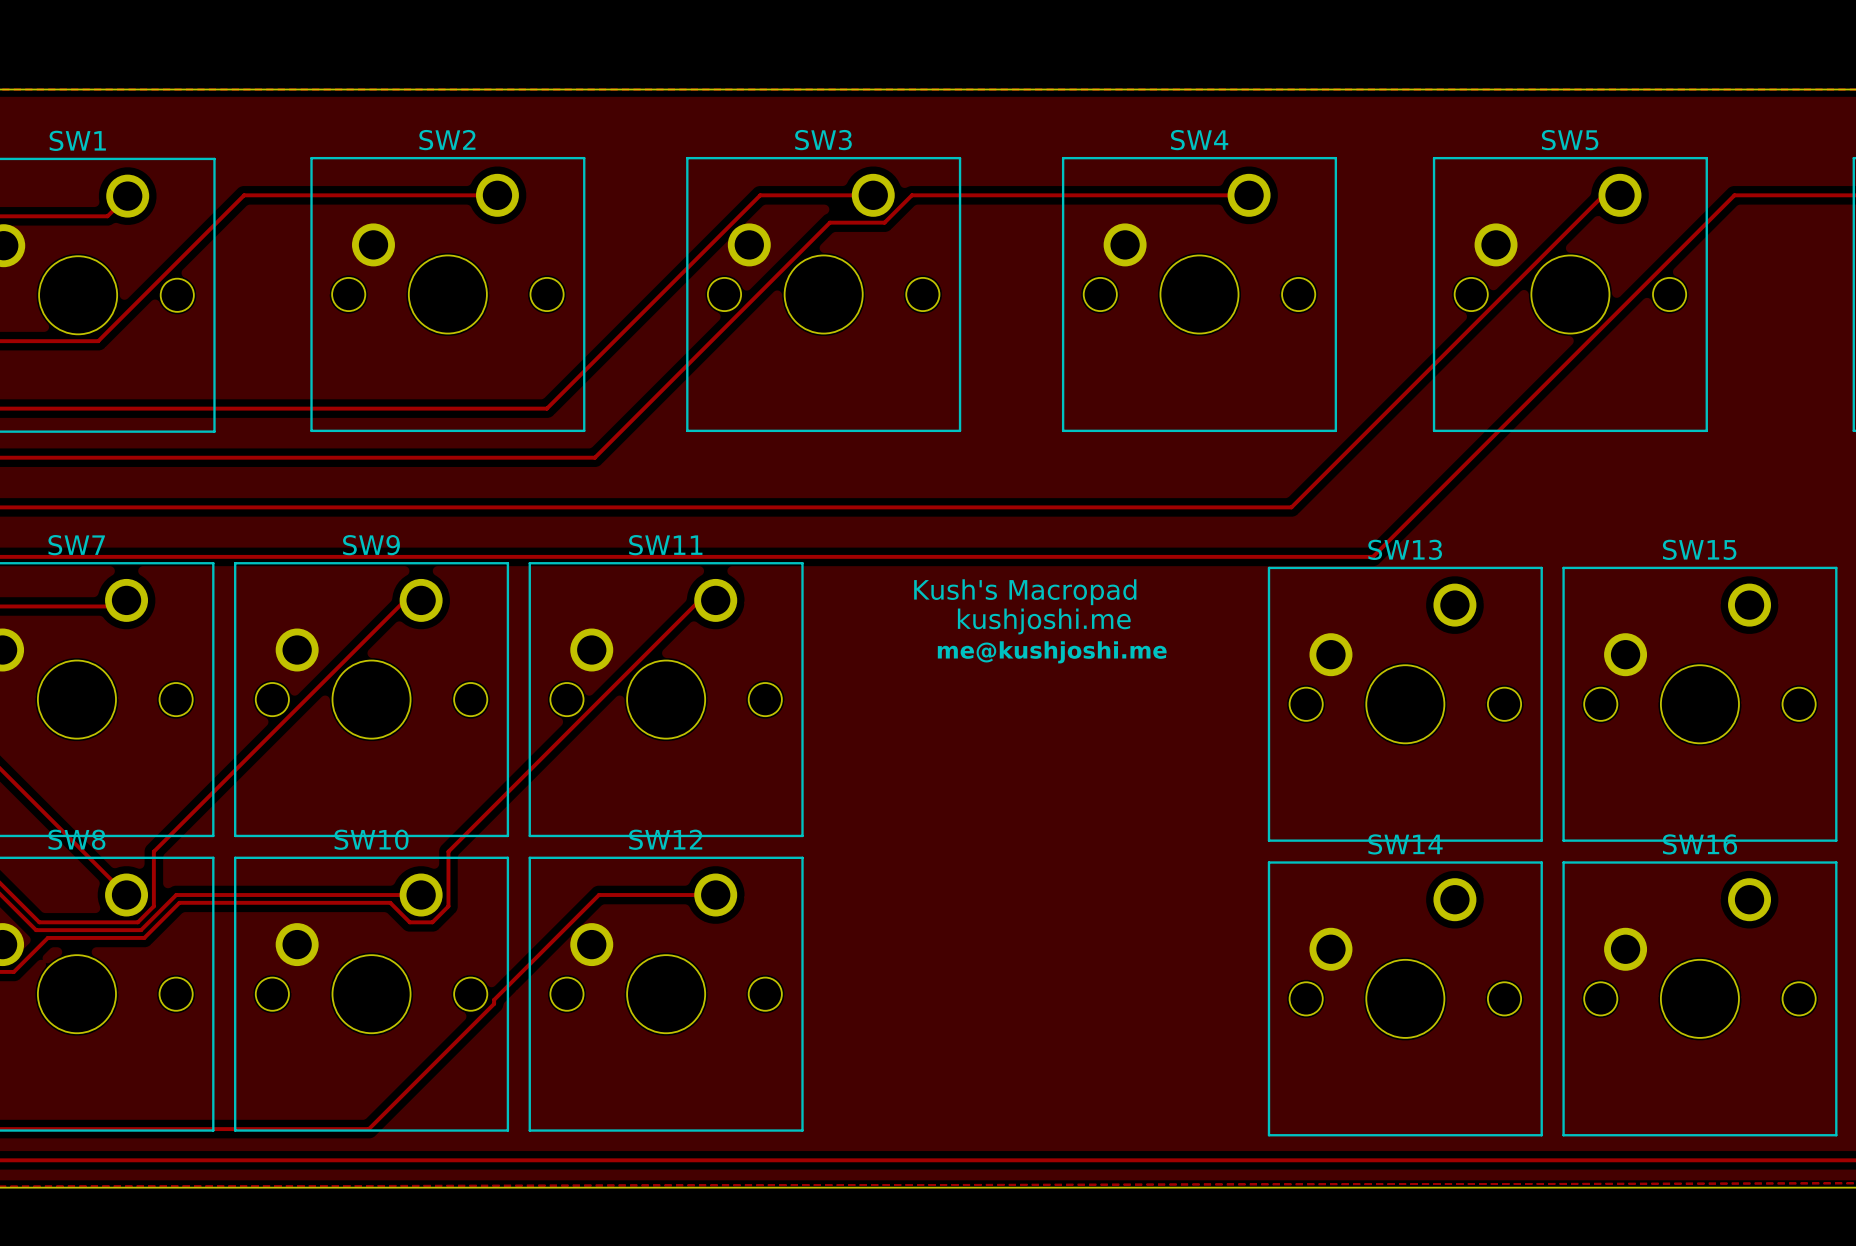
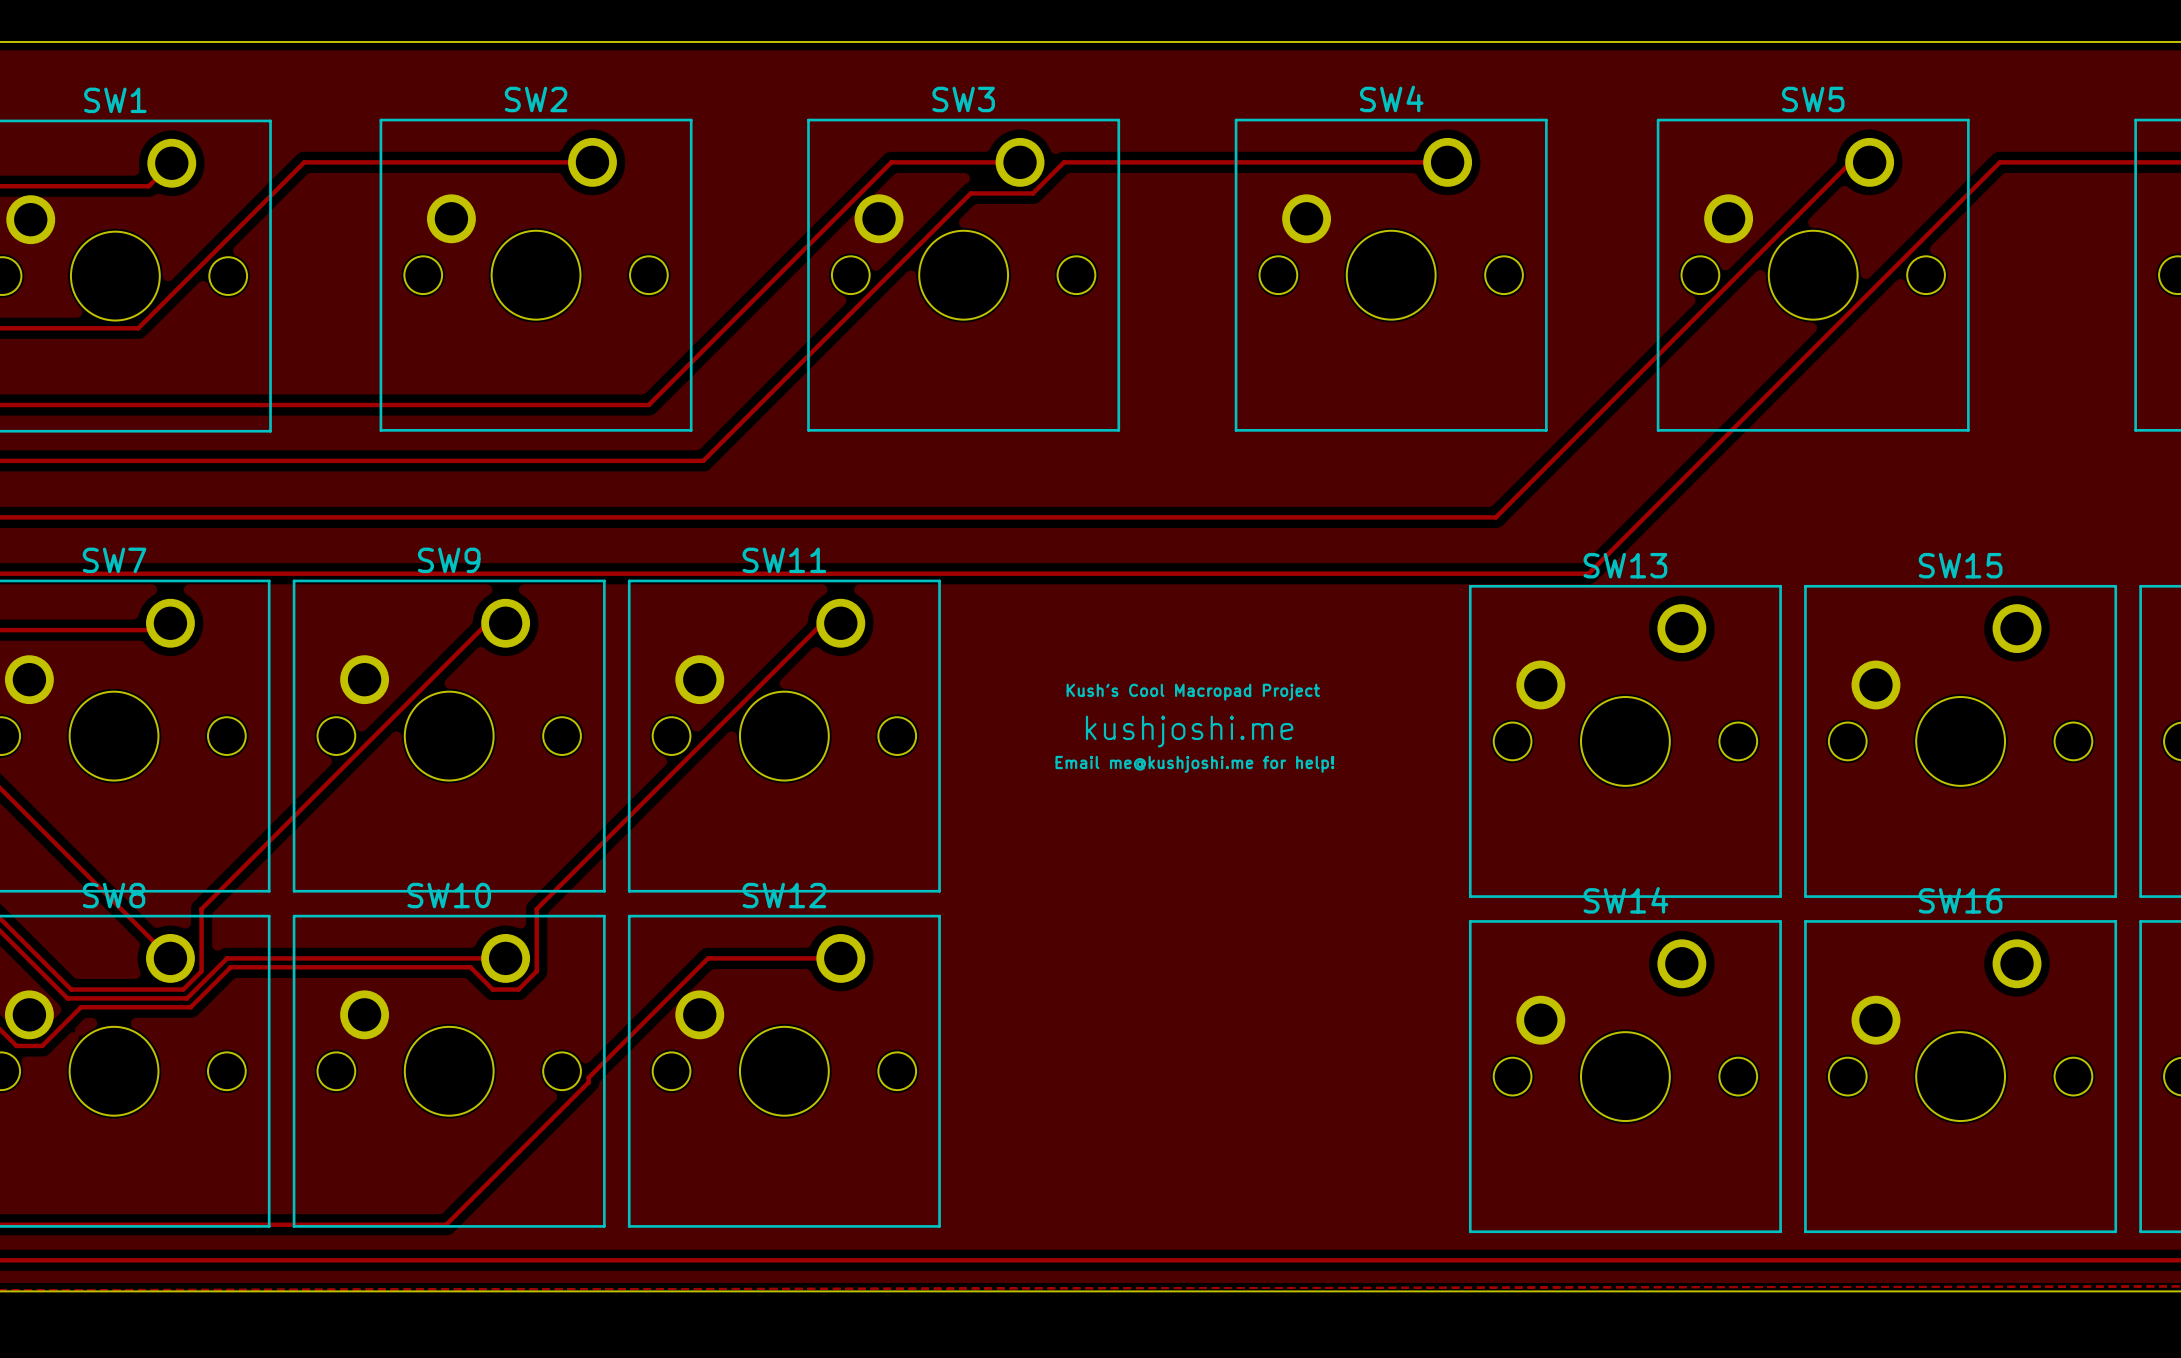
text: Kush's Macropad (1025, 592) -> none
text position: kushjoshi.me (1044, 621) -> kushjoshi.me (1189, 731)
text: me@kushjoshi.me (1052, 652) -> none
text: none -> Kush's Cool Macropad Project (1193, 692)
text: none -> Email me@kushjoshi.me for help! (1194, 764)

